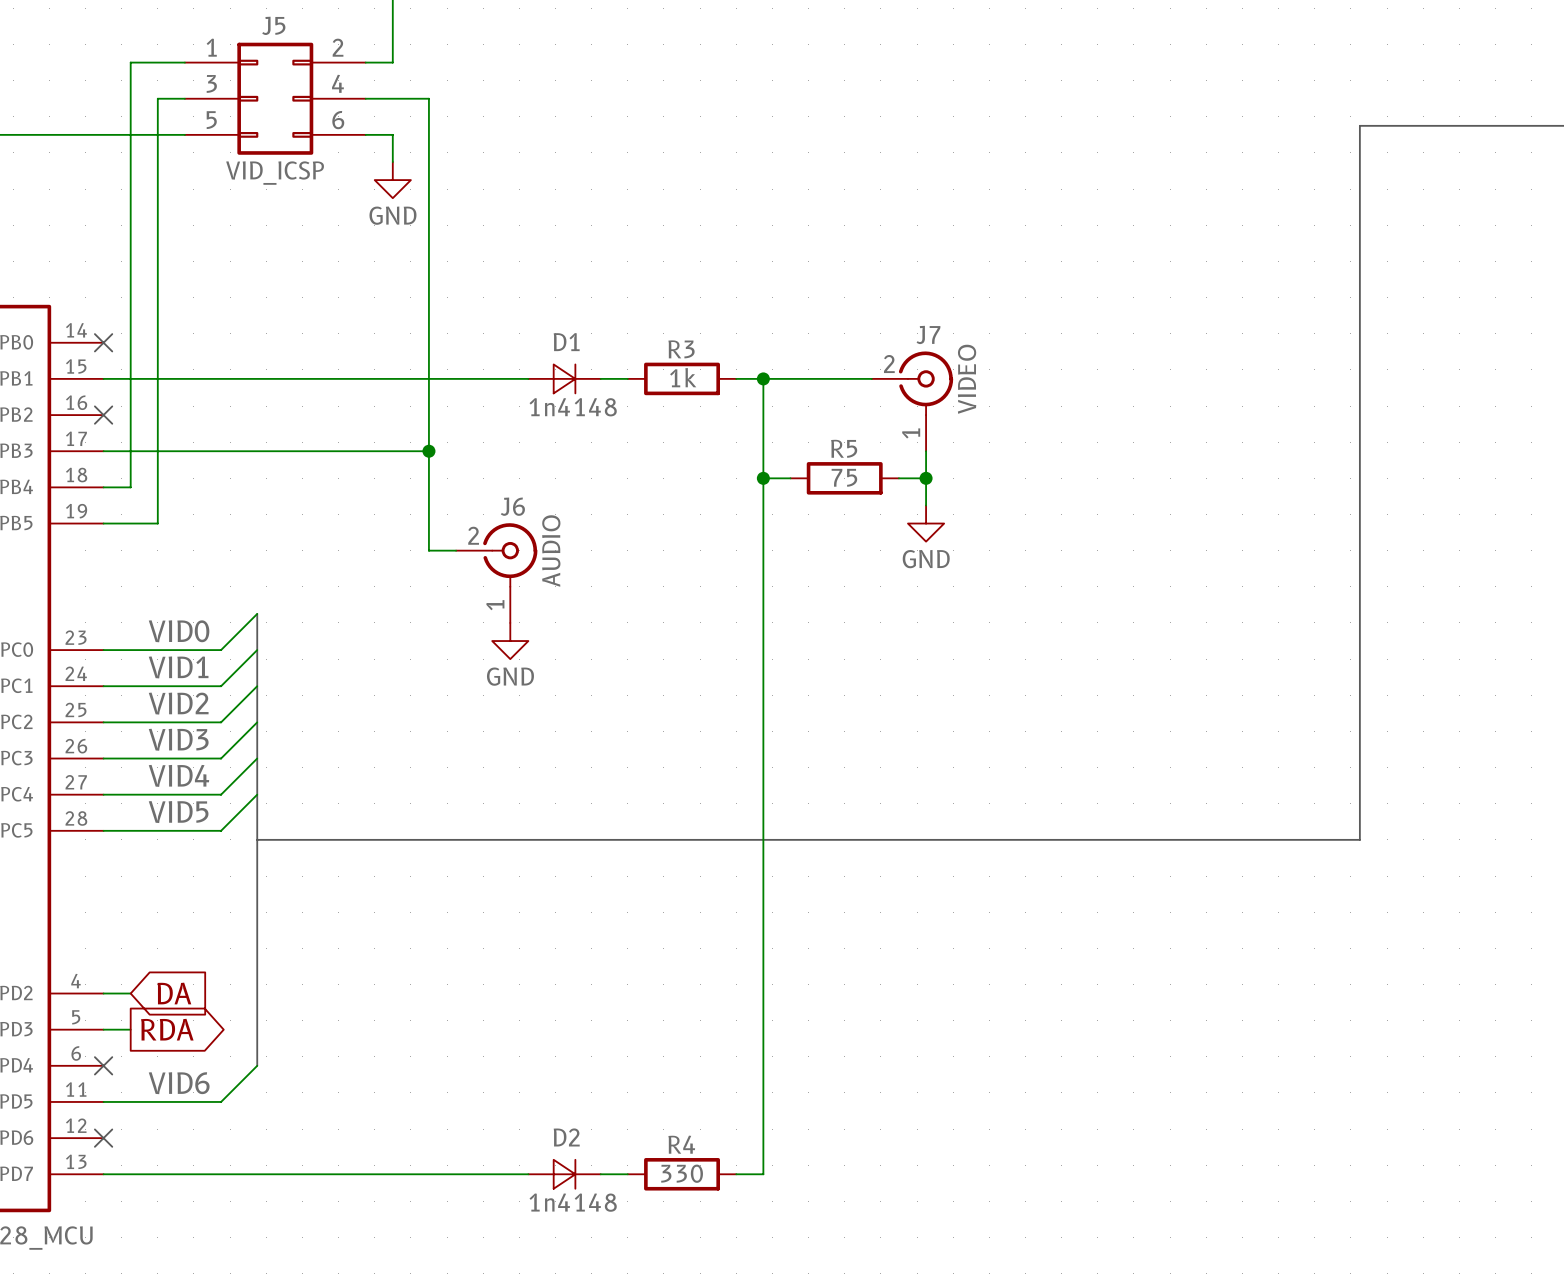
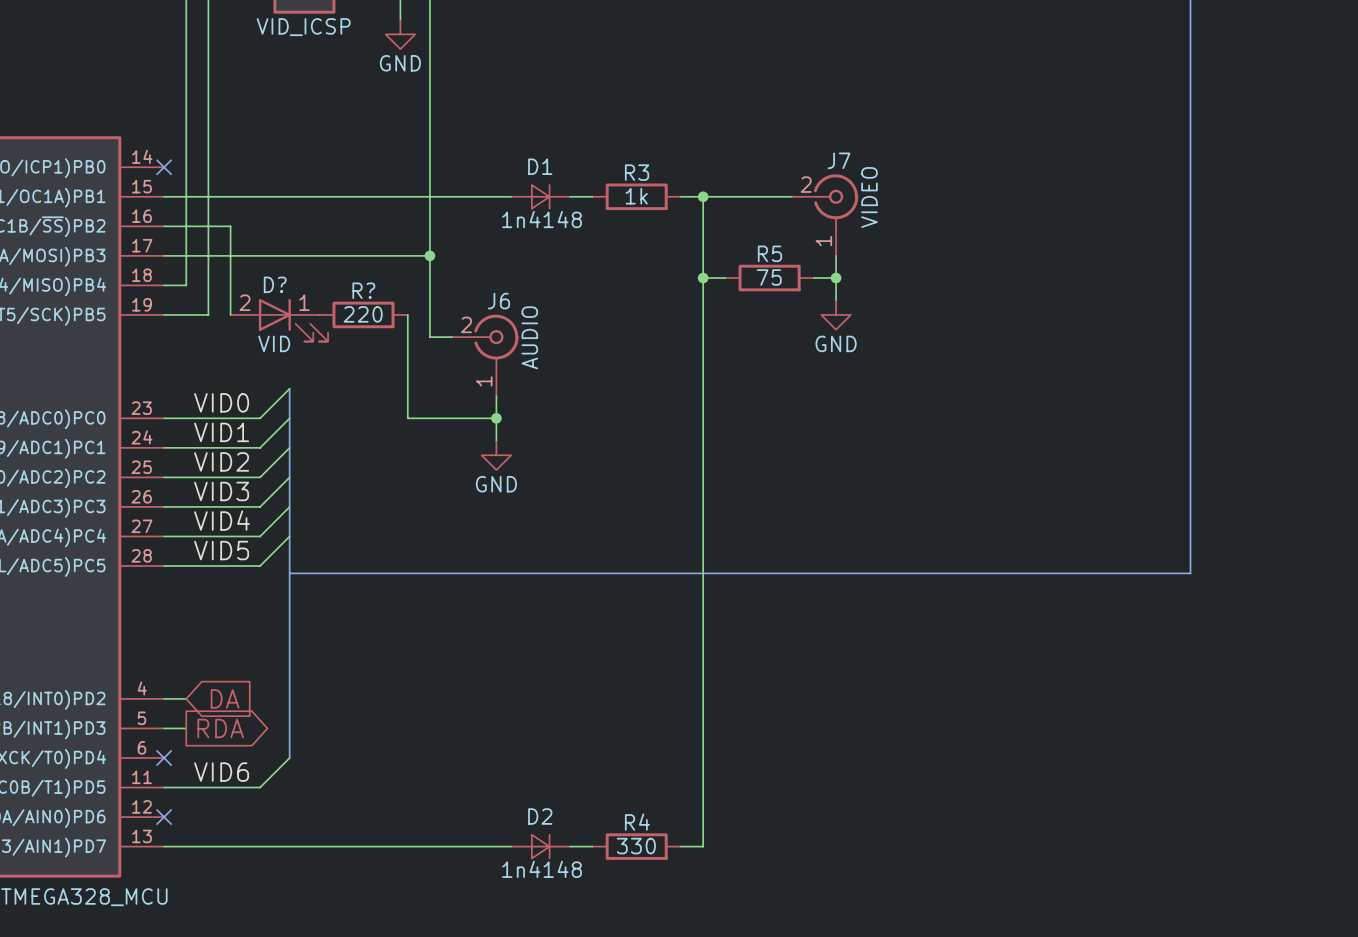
wire: none -> (164, 226) (230, 226) (230, 314)
no-connect mark: (103, 415) -> none
R?: none -> 220 (363, 314)
wire: none -> (407, 314) (407, 418) (496, 418)
D?: none -> VID (279, 320)
wire: none -> (496, 396) (496, 440)
power symbol position: GND (510, 641) -> GND (496, 455)
junction: none -> (496, 418)

